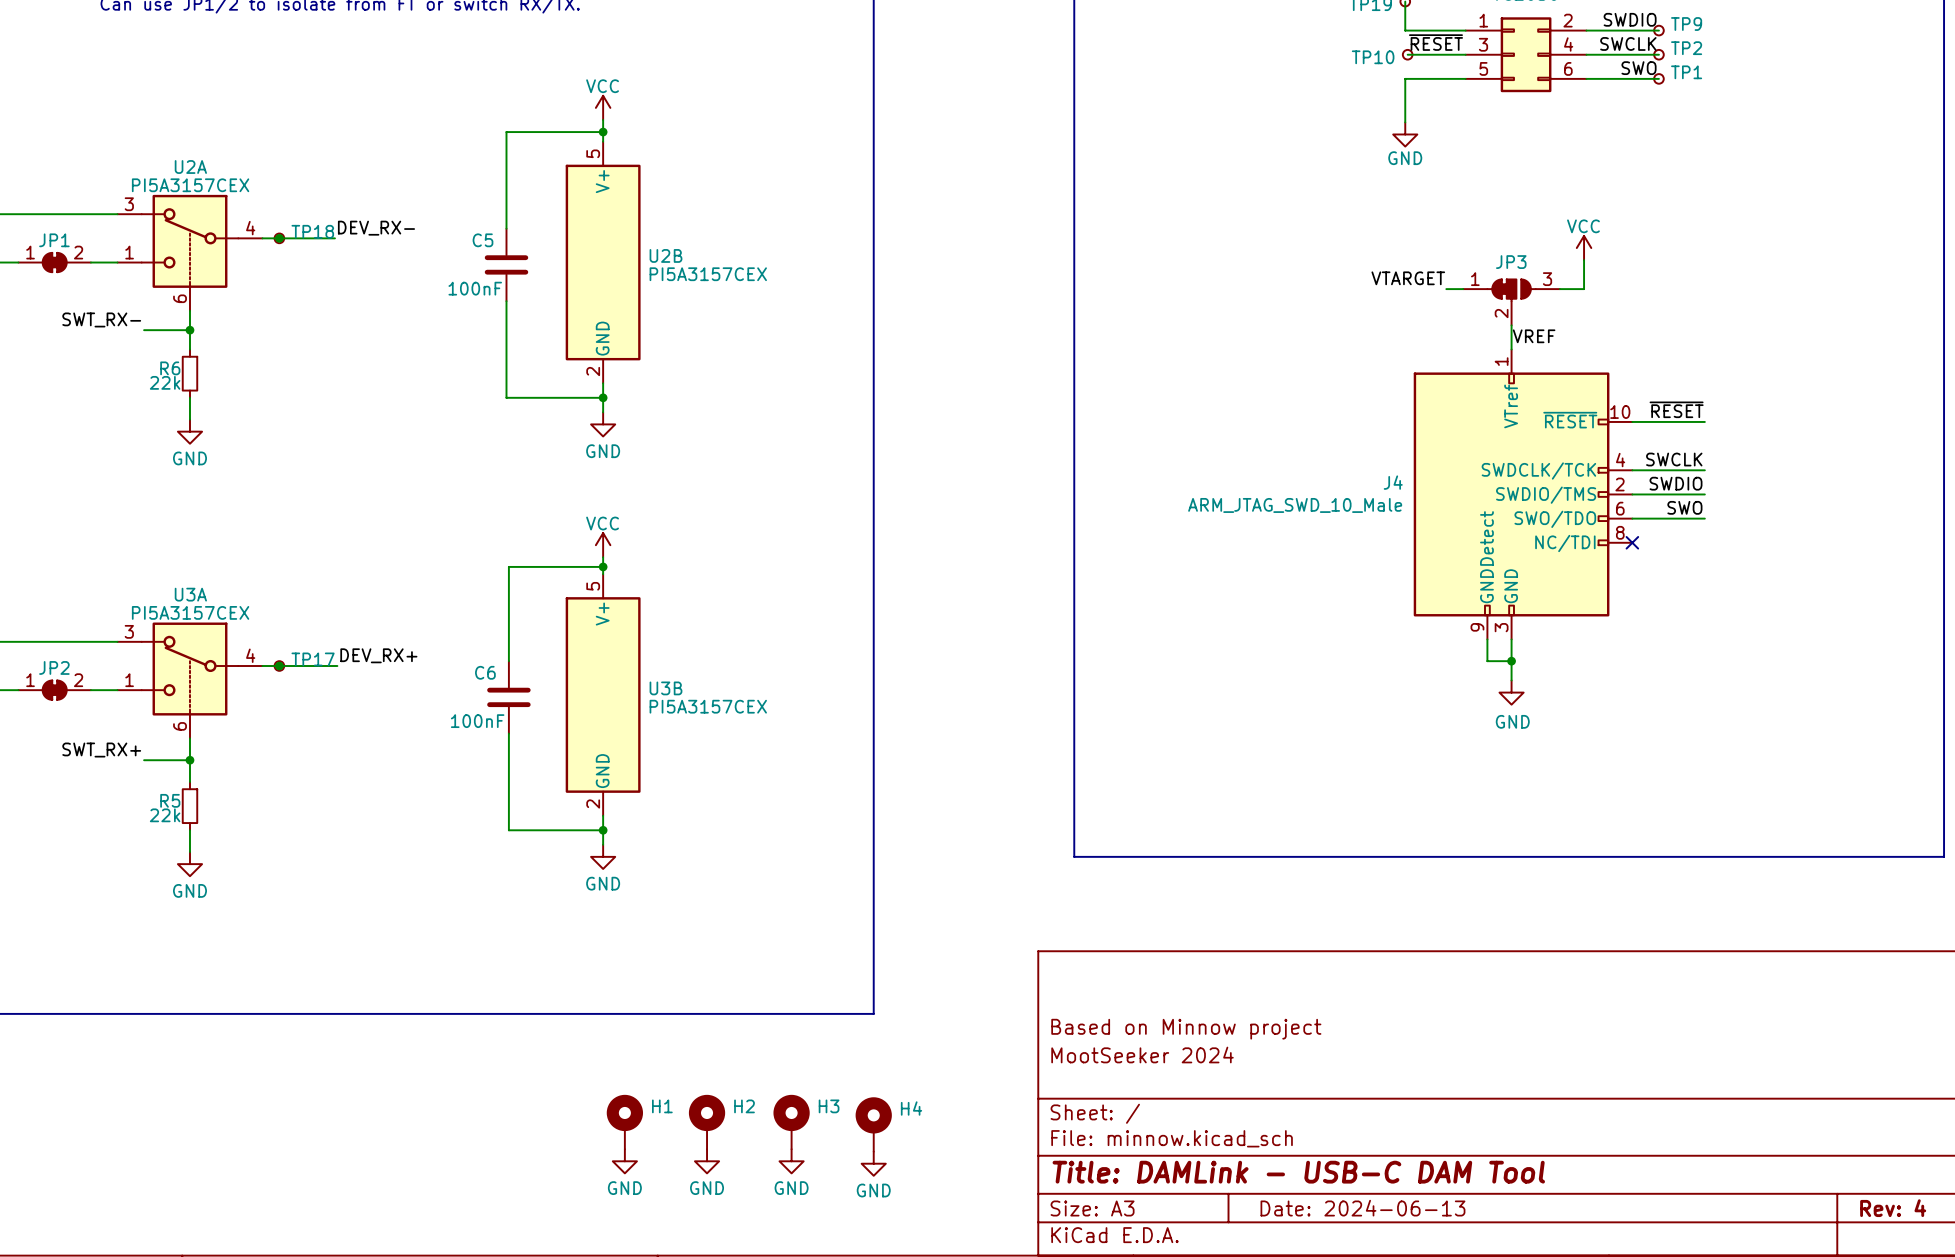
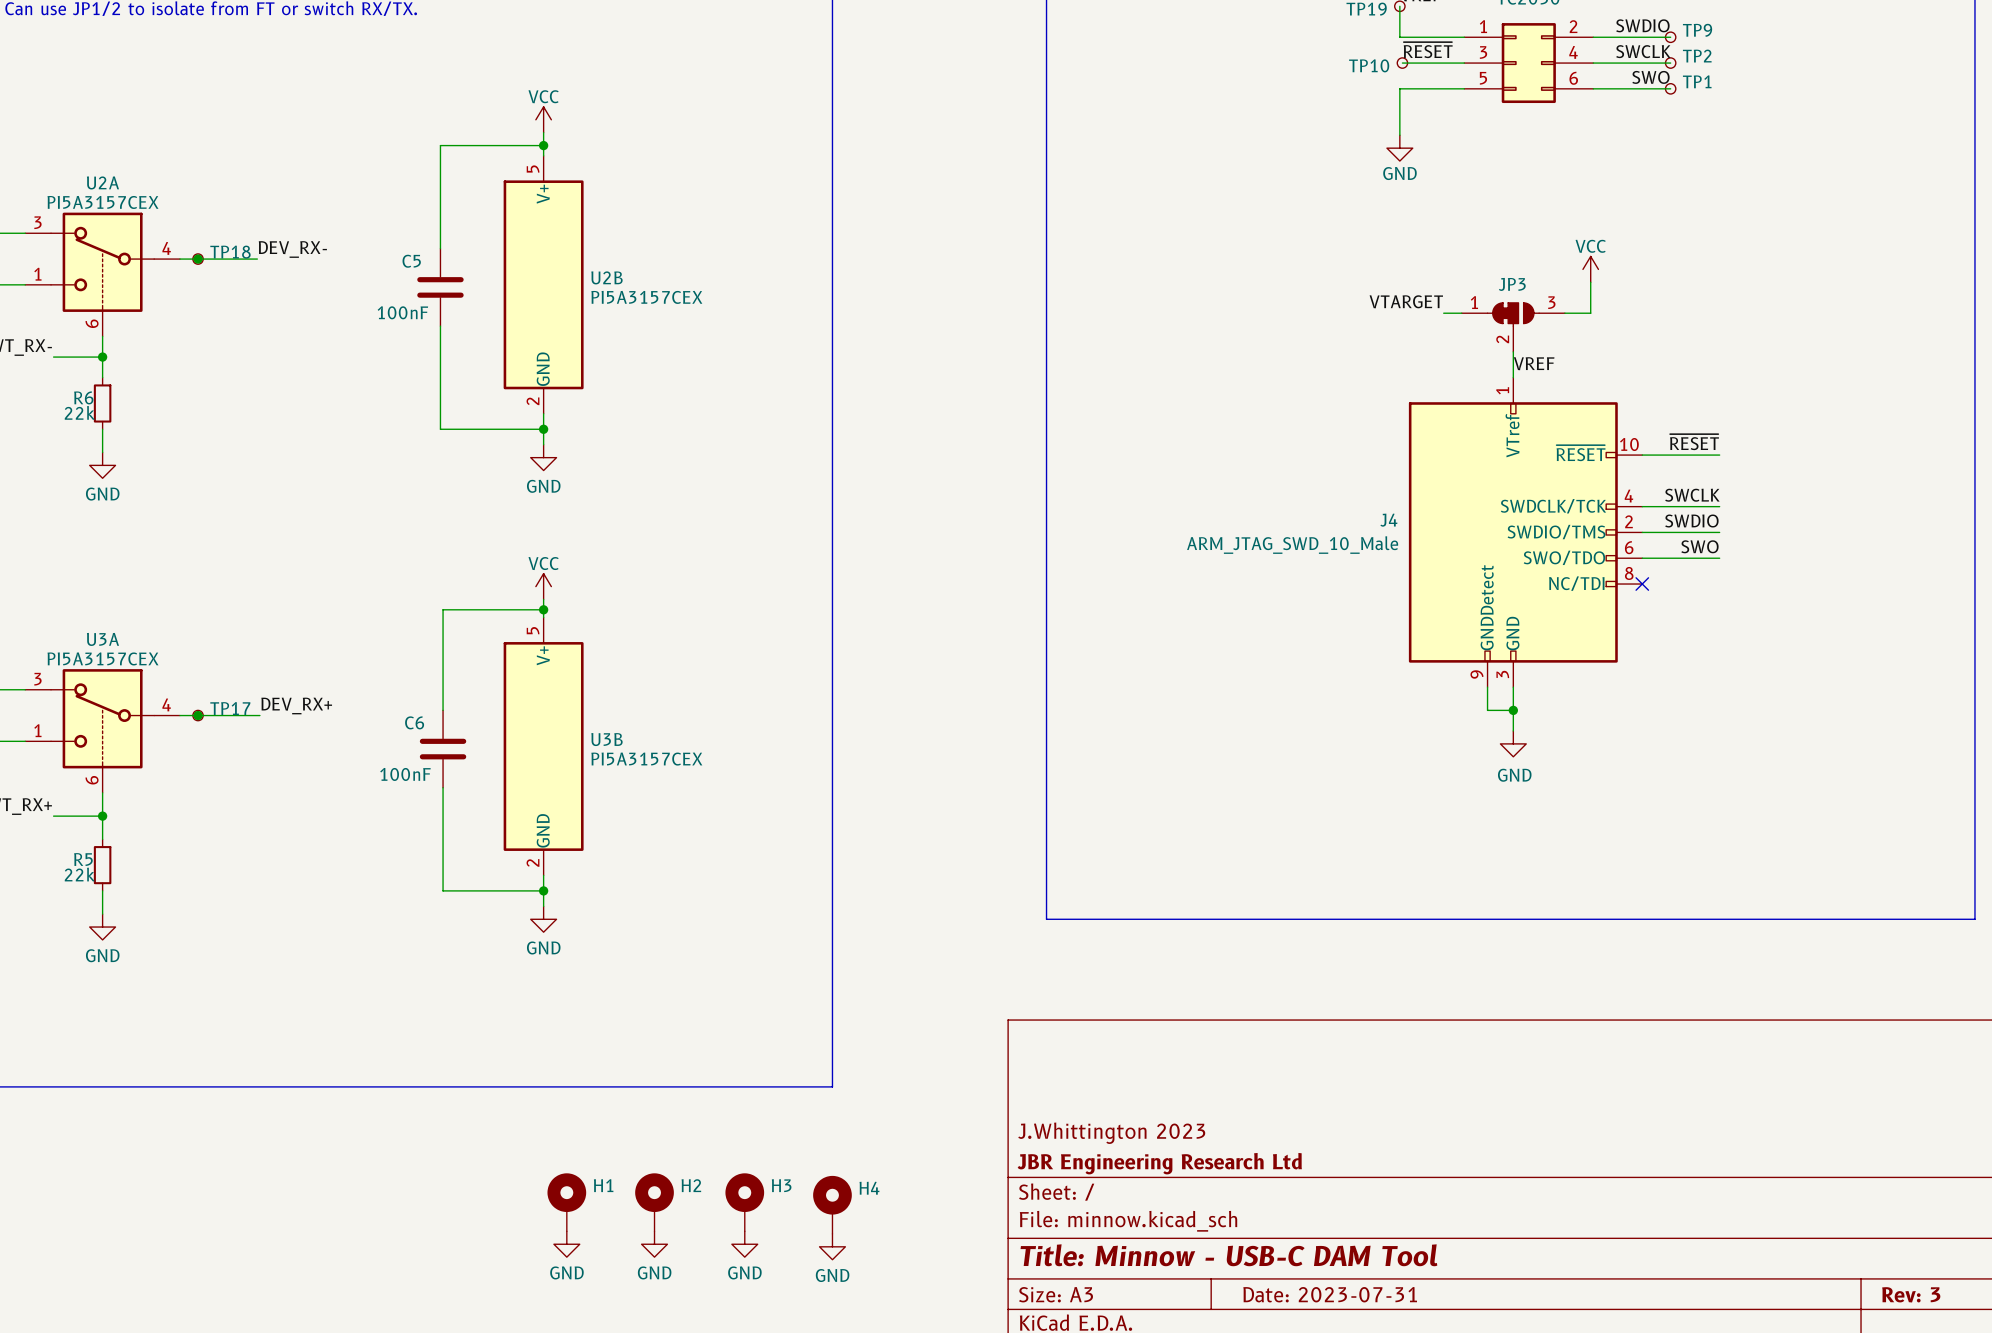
title block: Based on Minnow project (1186, 1029) -> none
title block: MootSeeker 2024 (1142, 1055) -> J.Whittington 2023 (1111, 1133)
title block: none -> JBR Engineering Research Ltd (1159, 1163)
title block: Title: DAMLink - USB-C DAM Tool (1298, 1172) -> Title: Minnow - USB-C DAM Tool (1228, 1255)
title block: Date: 2024-06-13 (1362, 1208) -> Date: 2023-07-31 (1330, 1294)
title block: Rev: 4 (1893, 1208) -> Rev: 3 (1911, 1294)

